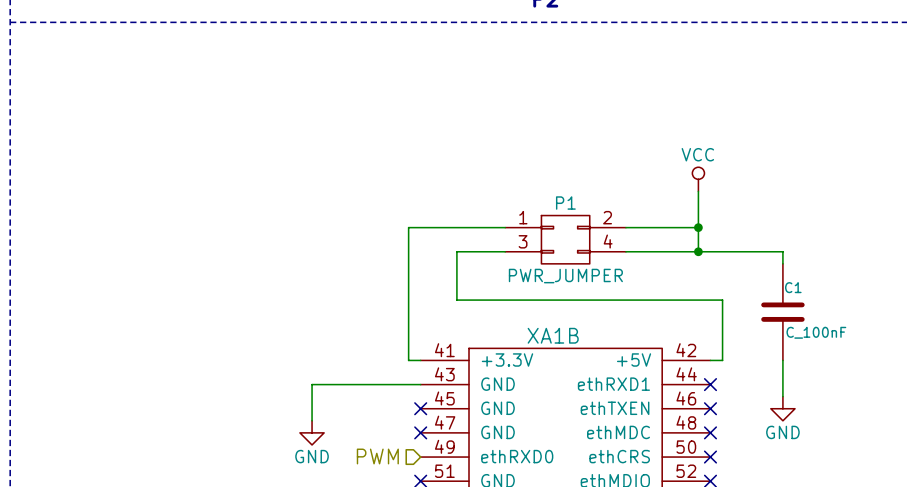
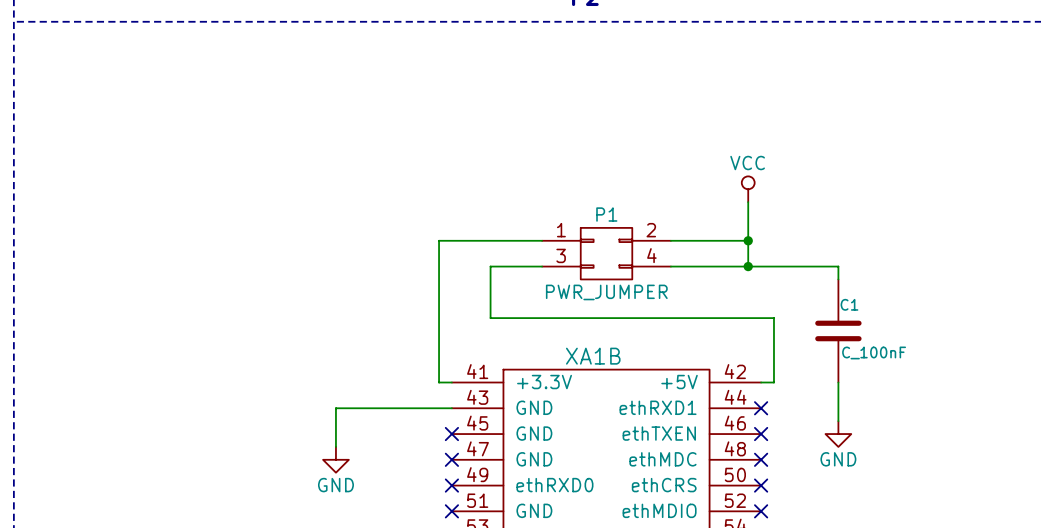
hierarchical label: PWM (377, 456) -> none
no-connect mark: none -> (451, 485)

